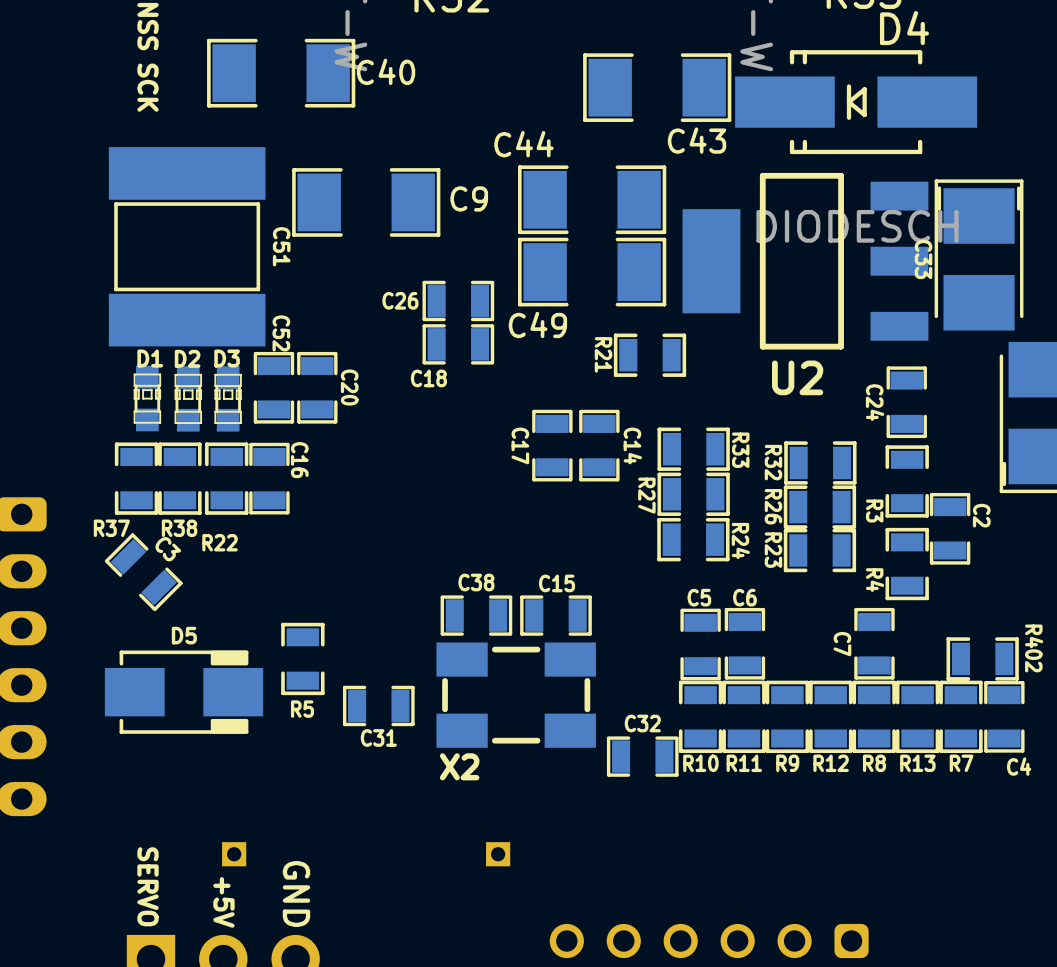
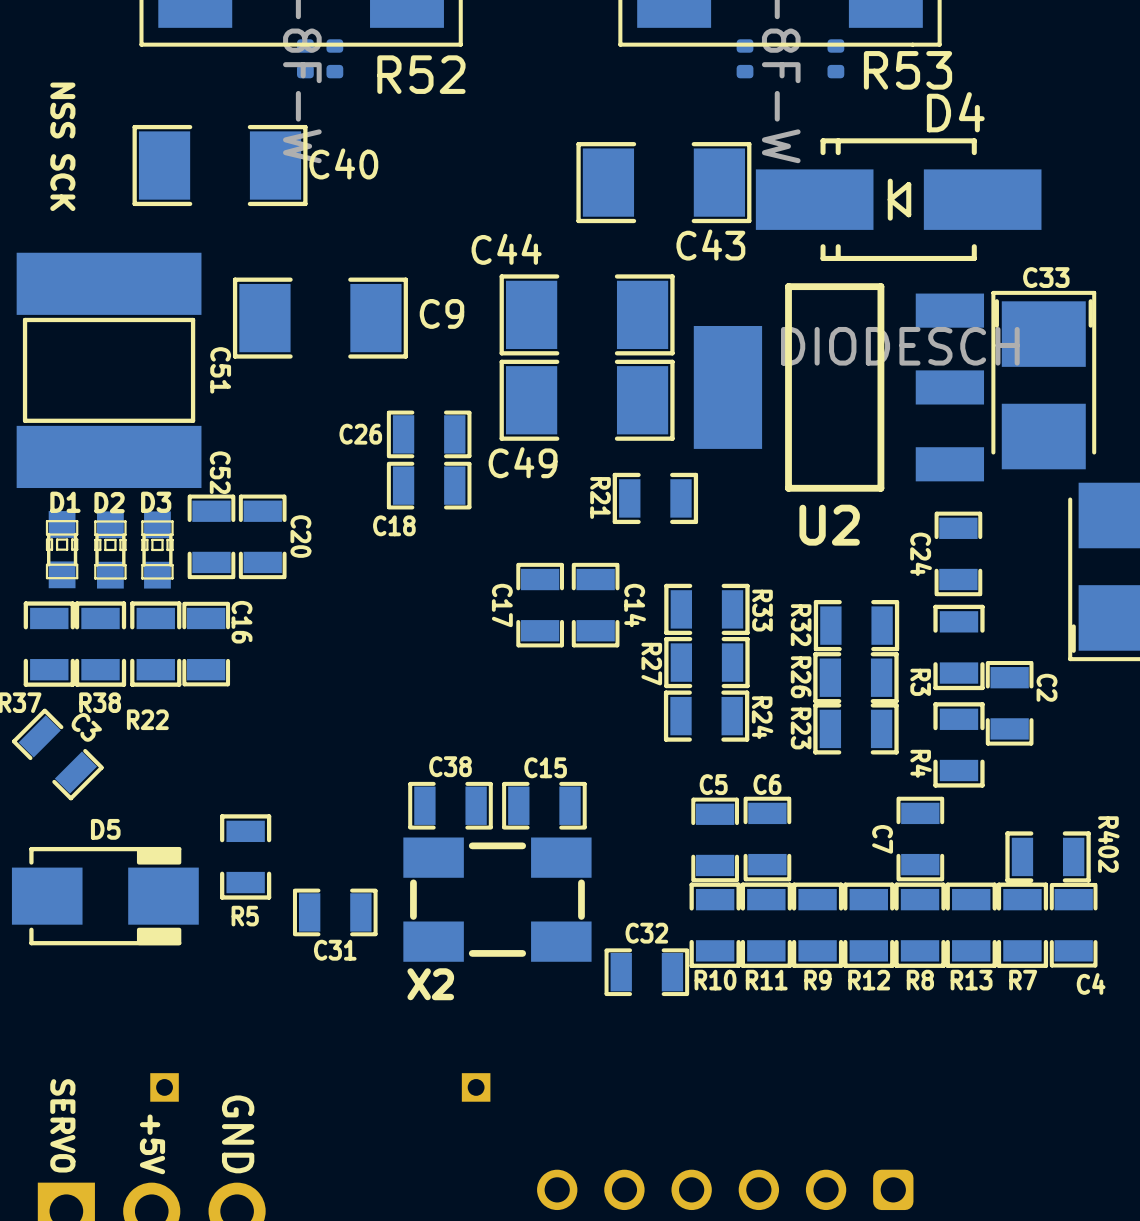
C33 name rotation: 0° (923, 259) -> 90° counterclockwise (1046, 277)
C33 name position: C33 (923, 259) -> C33 (1046, 277)

